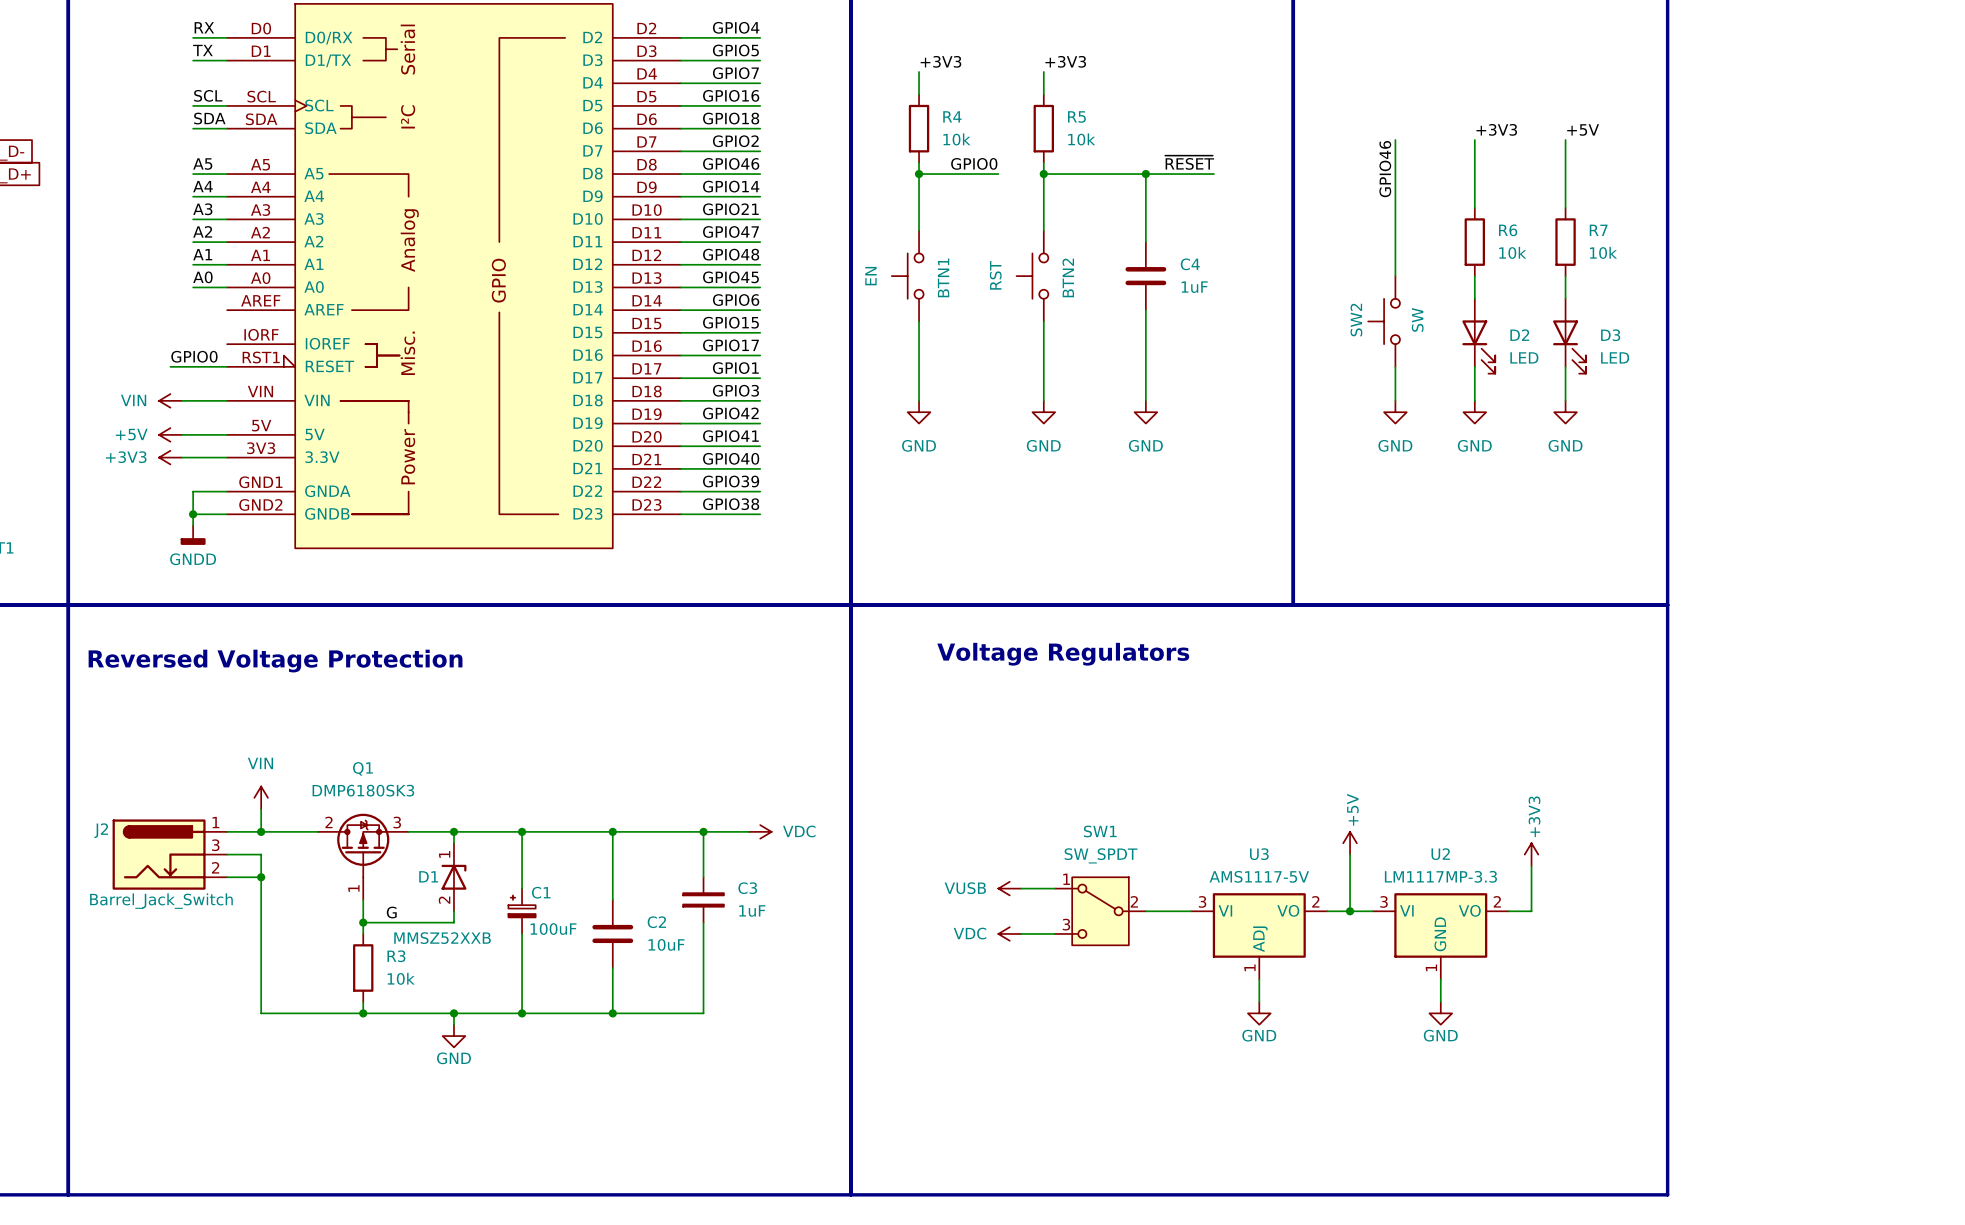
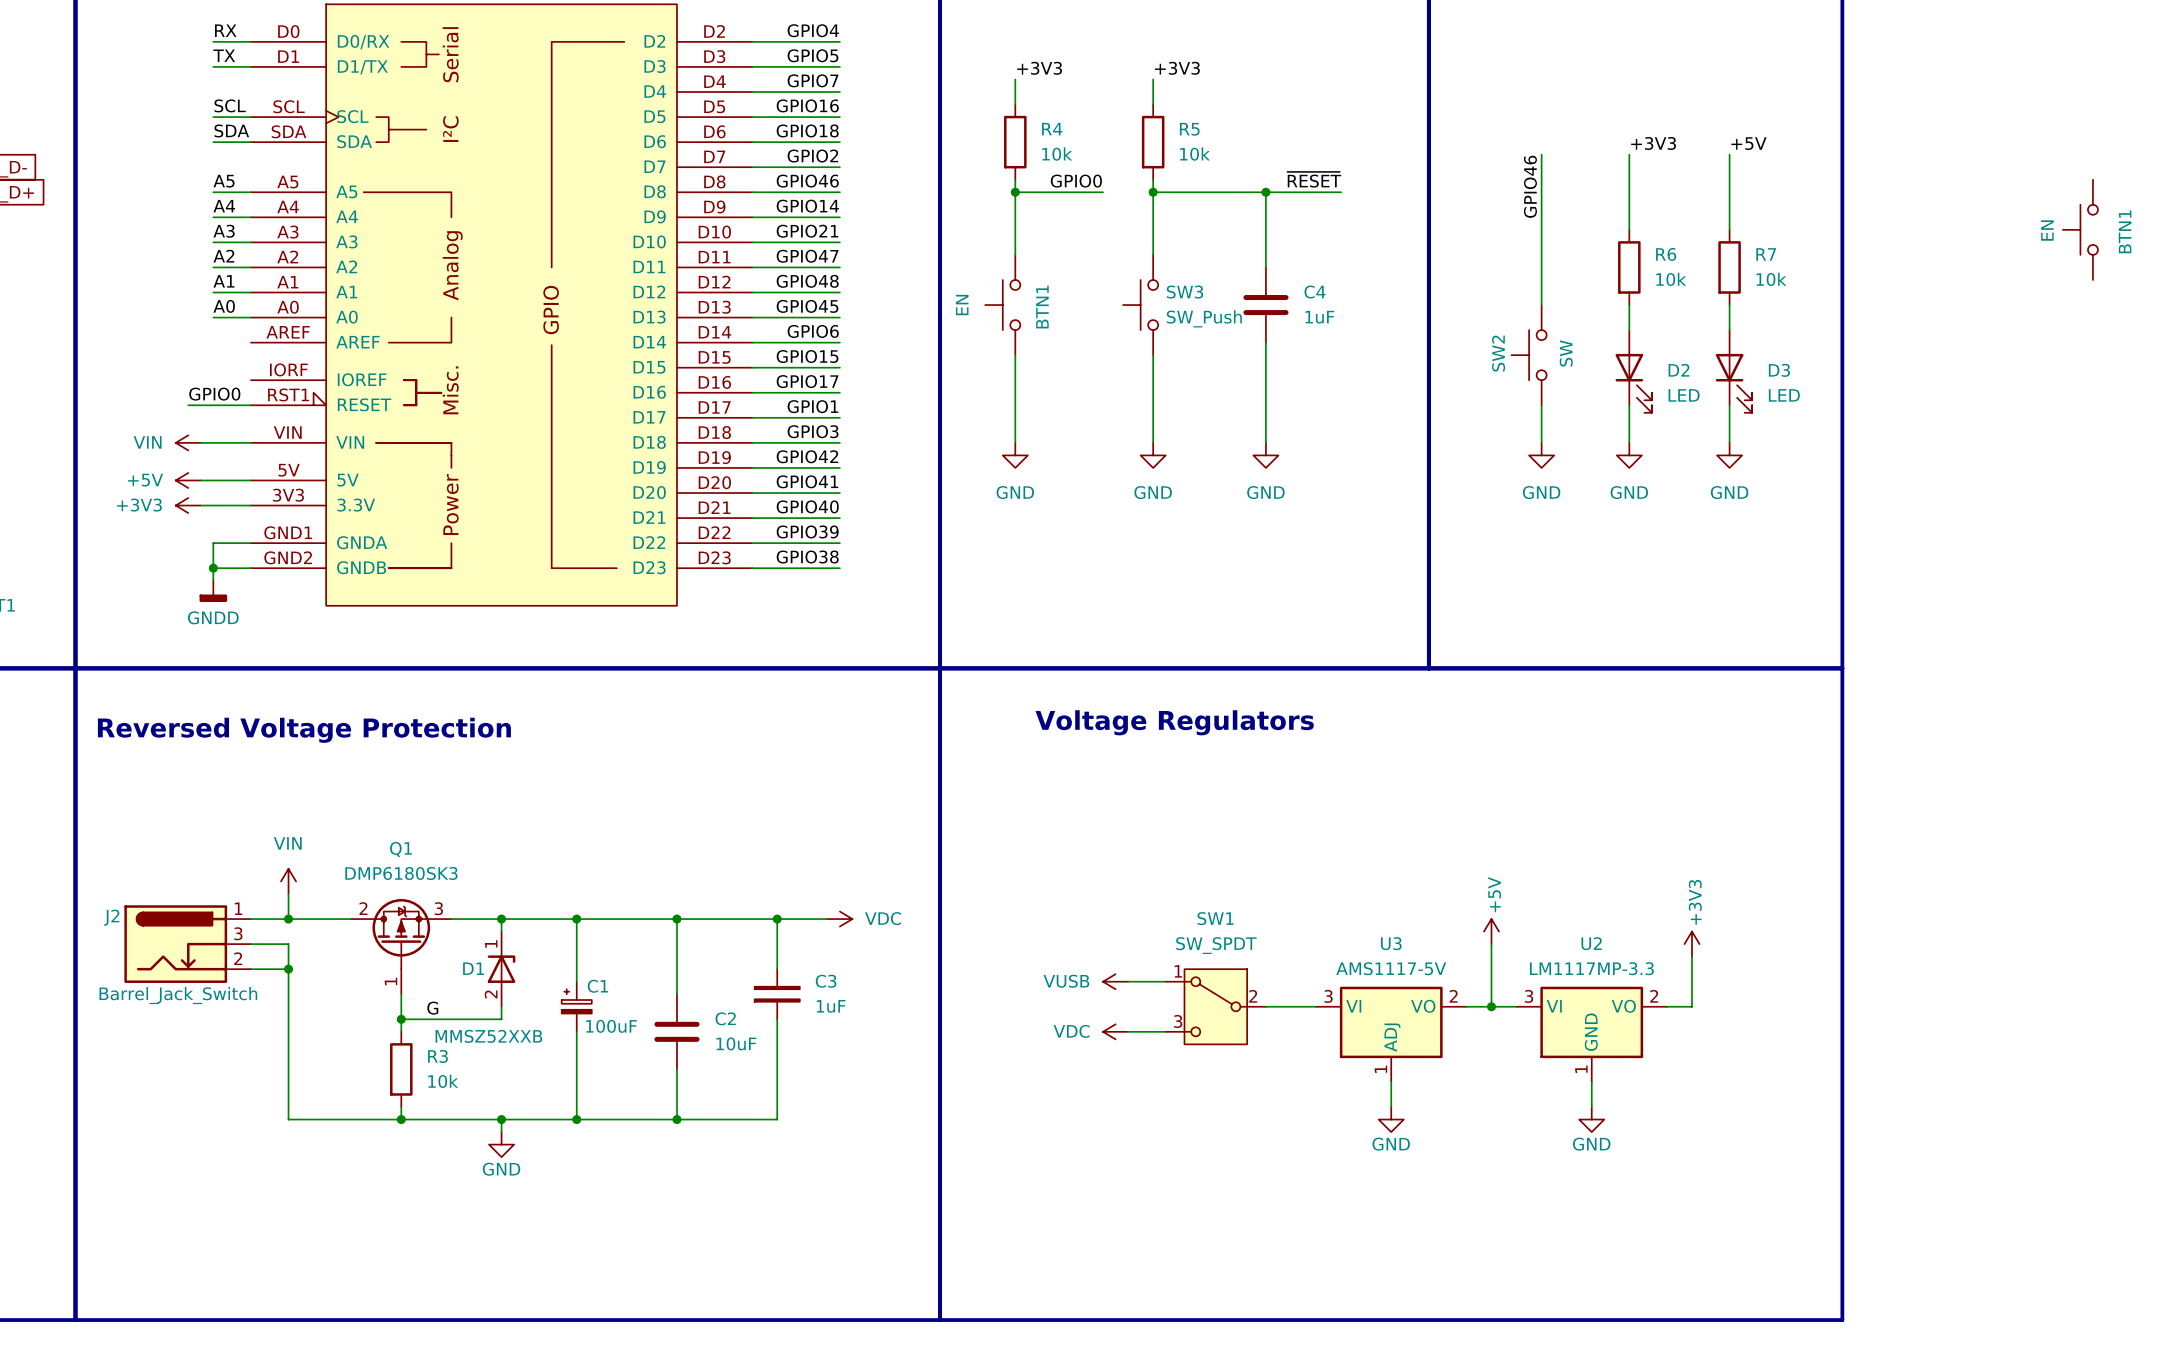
BTN1: none -> EN (2080, 229)
BTN2 value: RST (995, 275) -> SW_Push (1204, 318)
BTN2 name: BTN2 (1068, 277) -> SW3 (1184, 292)

